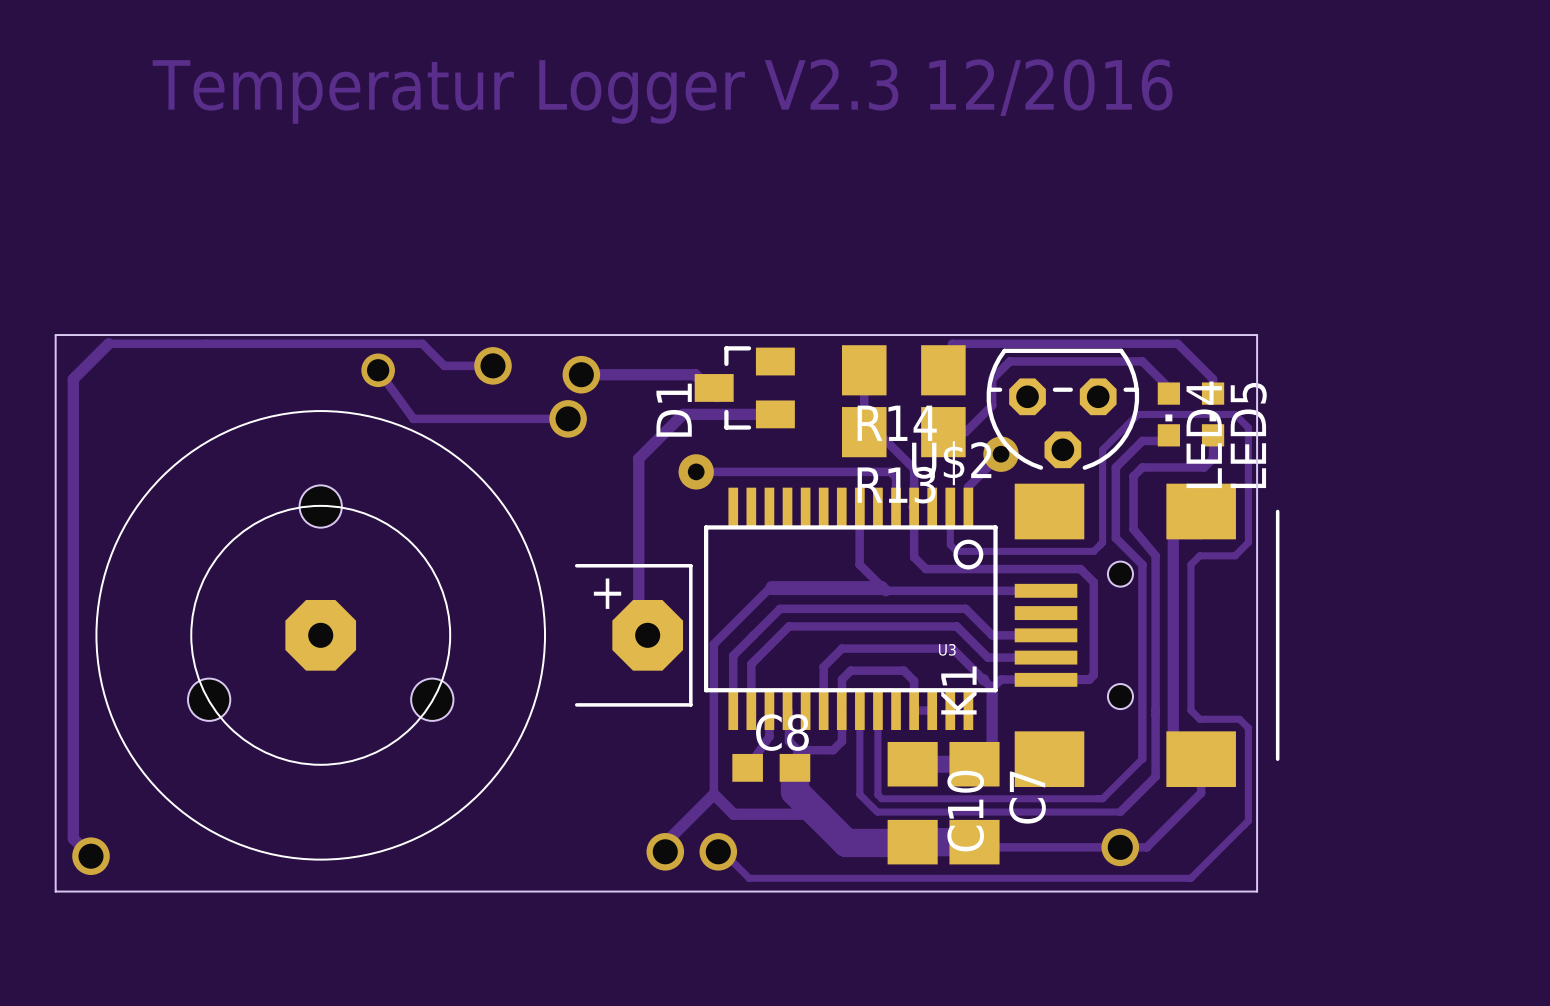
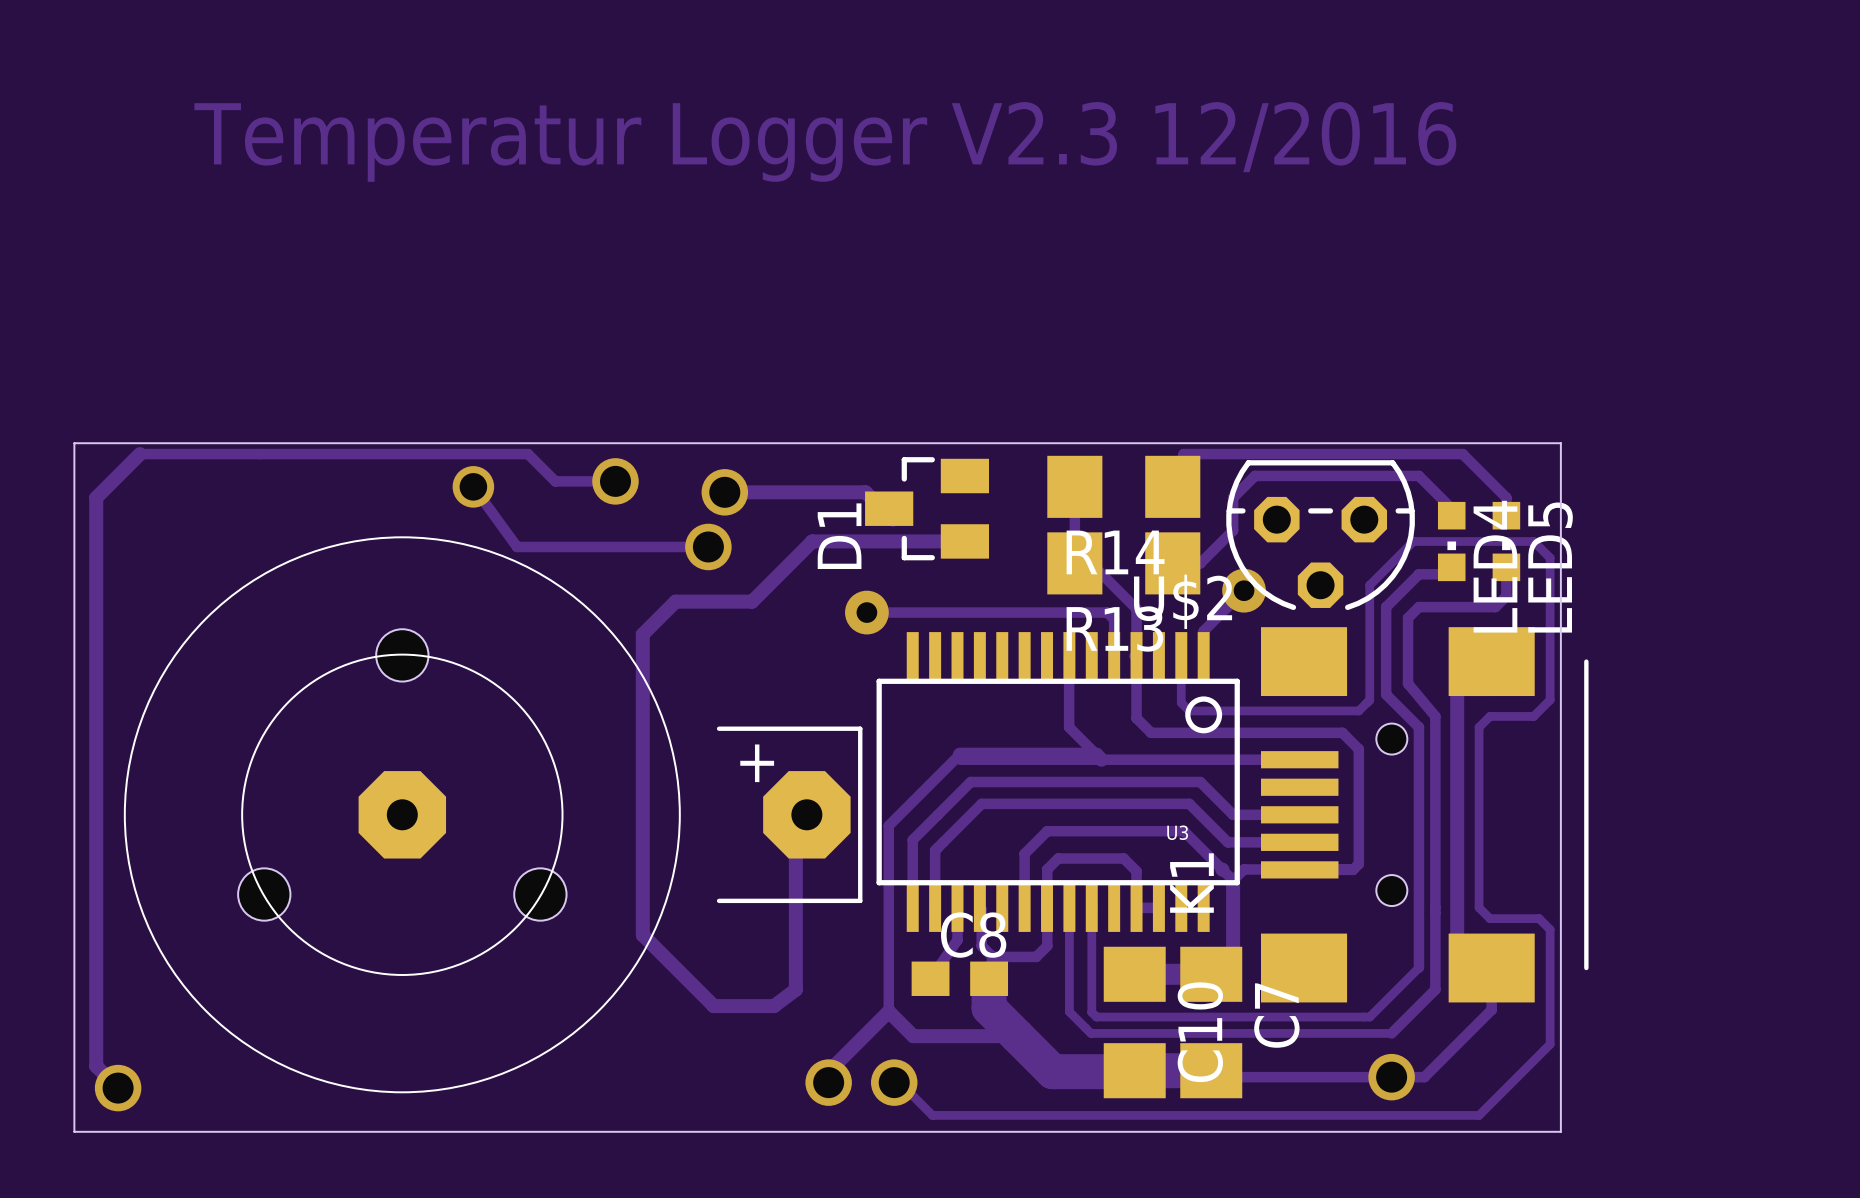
track: (683, 414) (638, 458) (638, 626) (647, 635) -> (850, 541) (812, 541) (752, 601) (675, 601) (642, 634) (642, 935) (713, 1006) (773, 1006) (795, 989) (795, 809) (806, 814)

